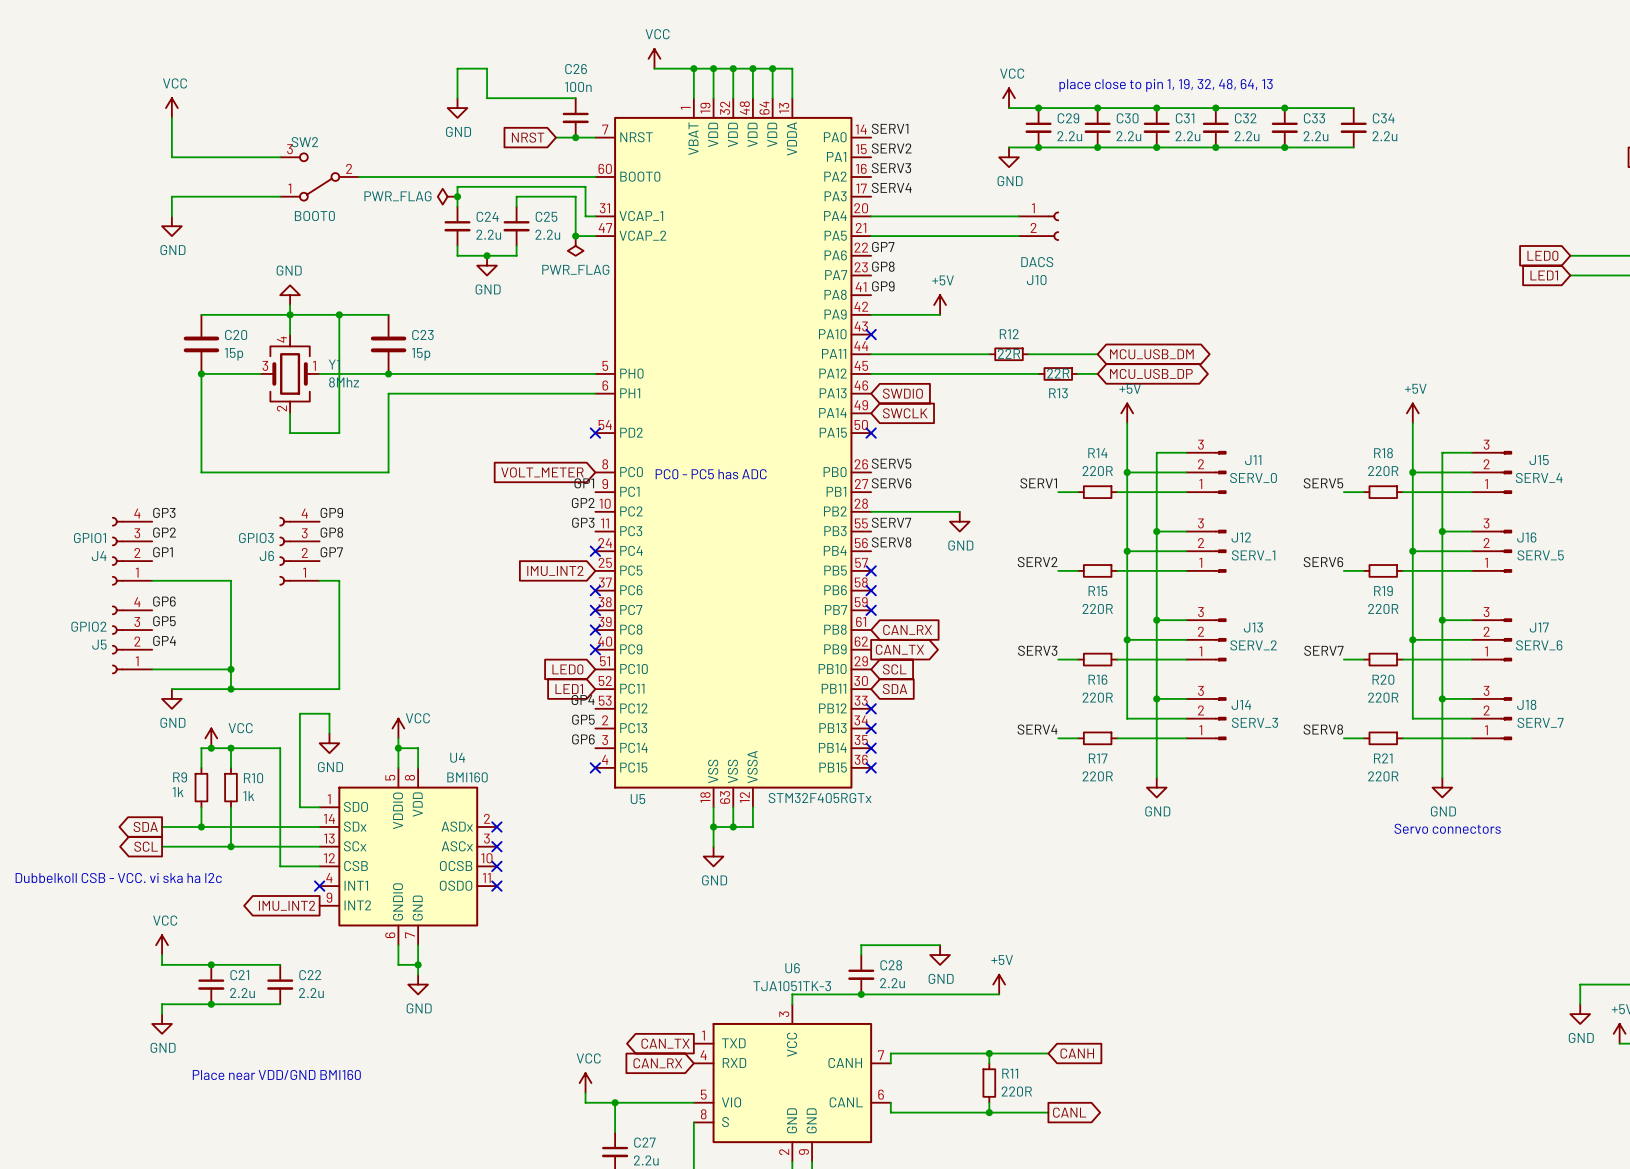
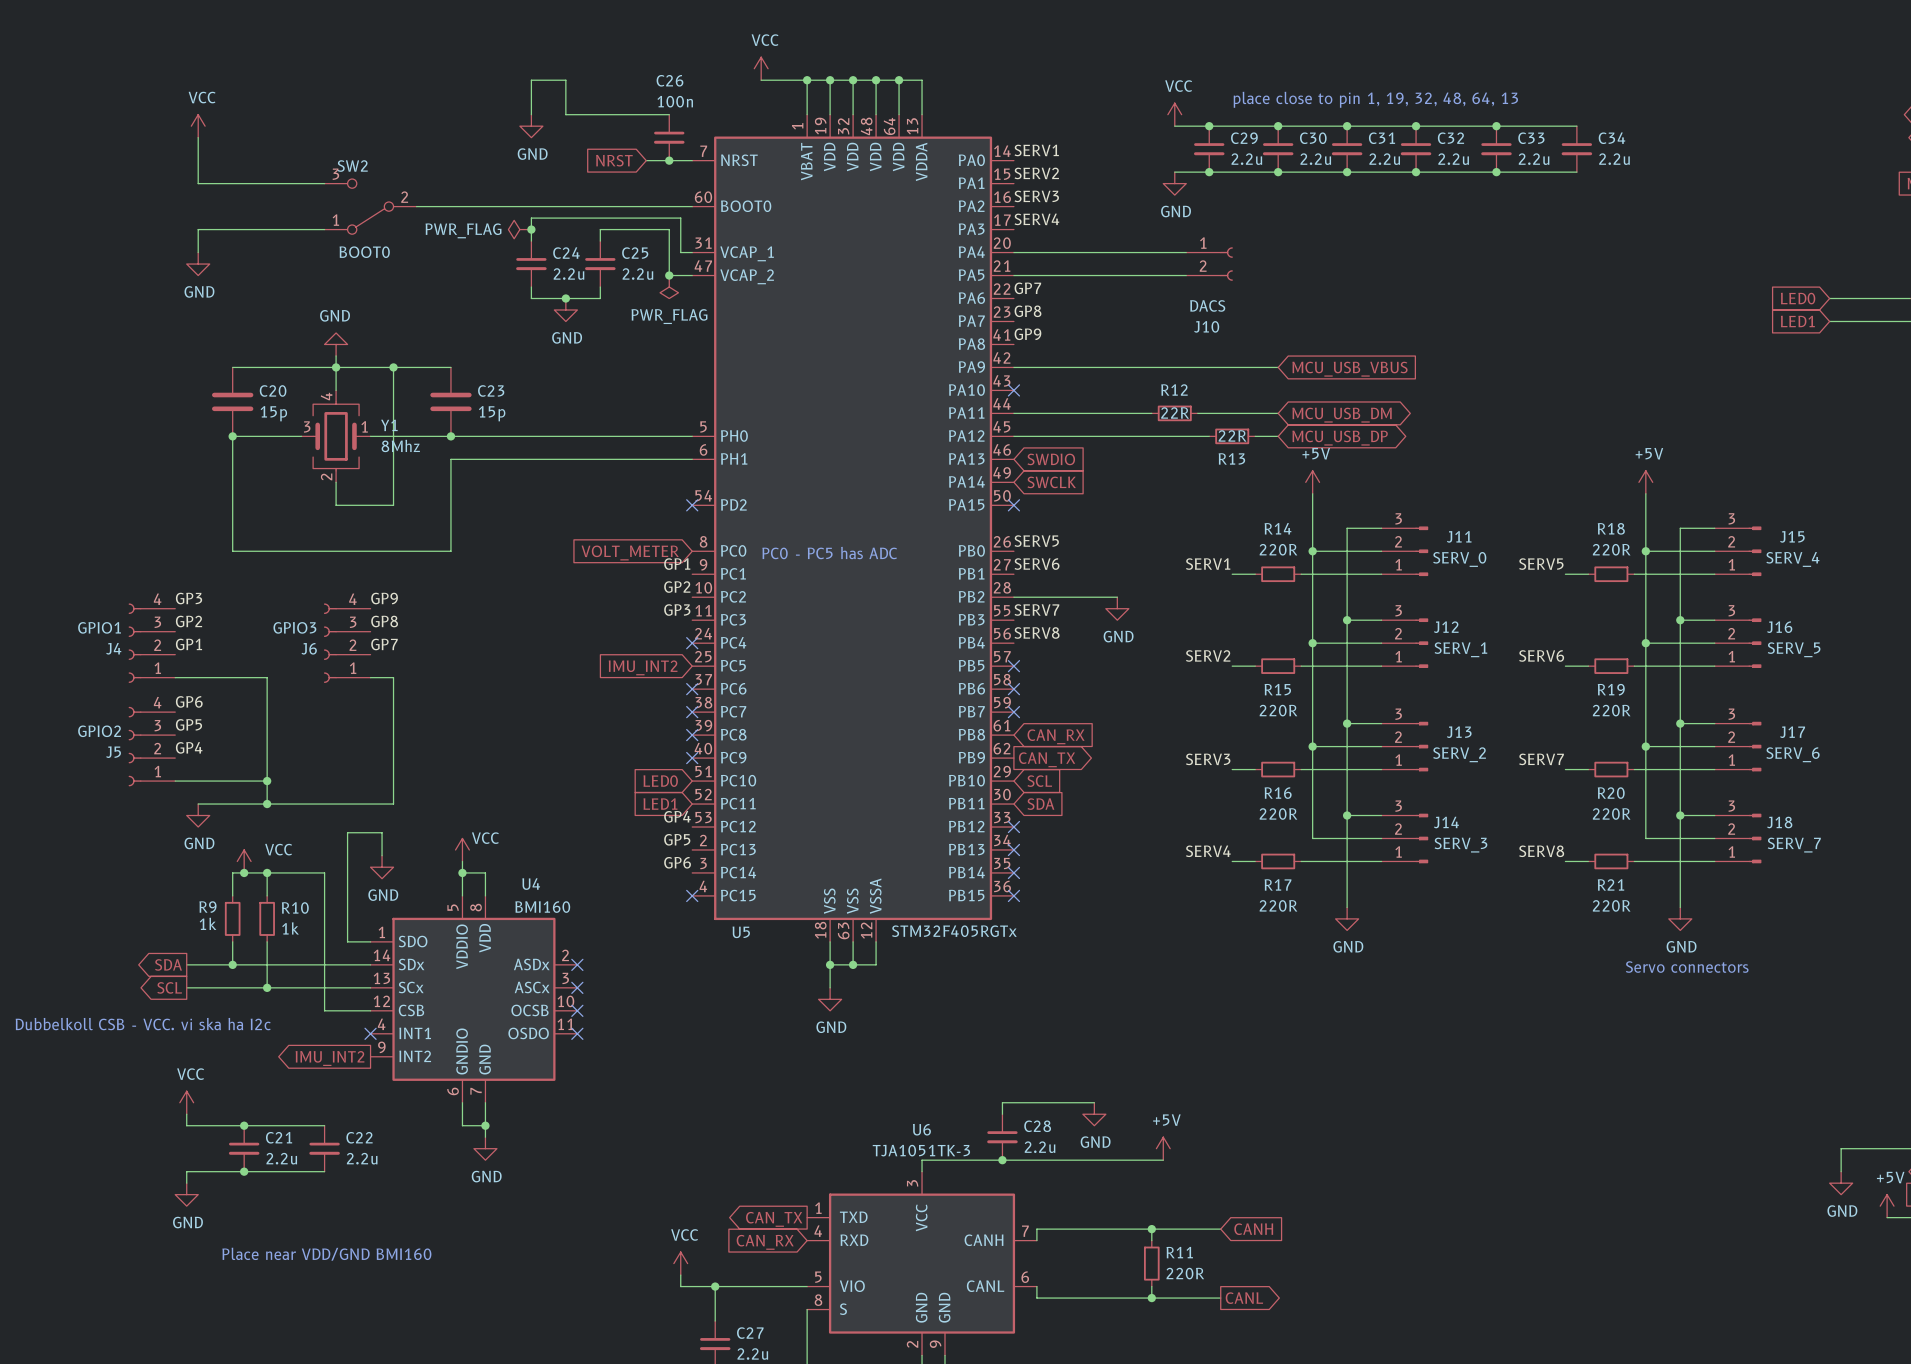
power symbol: +5V (940, 305) -> none
wire: none -> (1094, 367) (1278, 367)
global label: none -> MCU_USB_VBUS (1349, 369)

